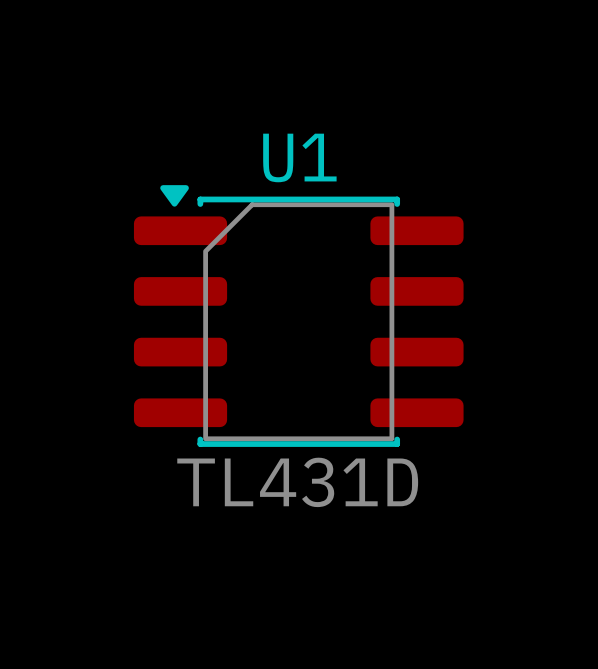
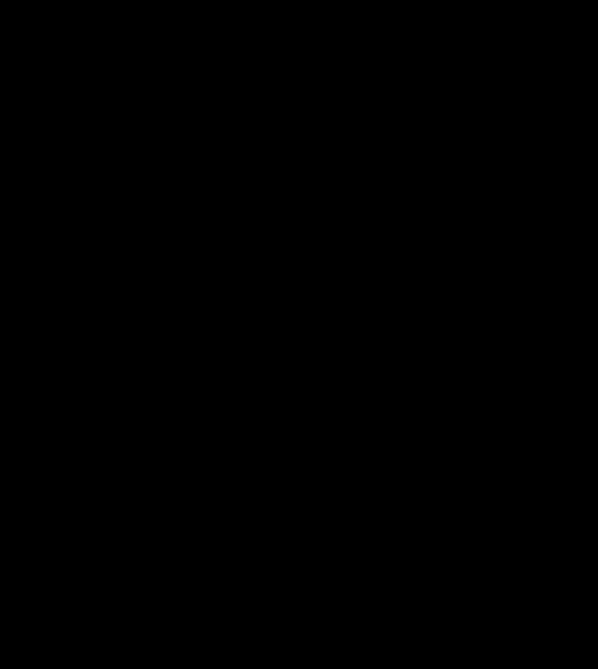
U1: TL431D (298, 316) -> none

